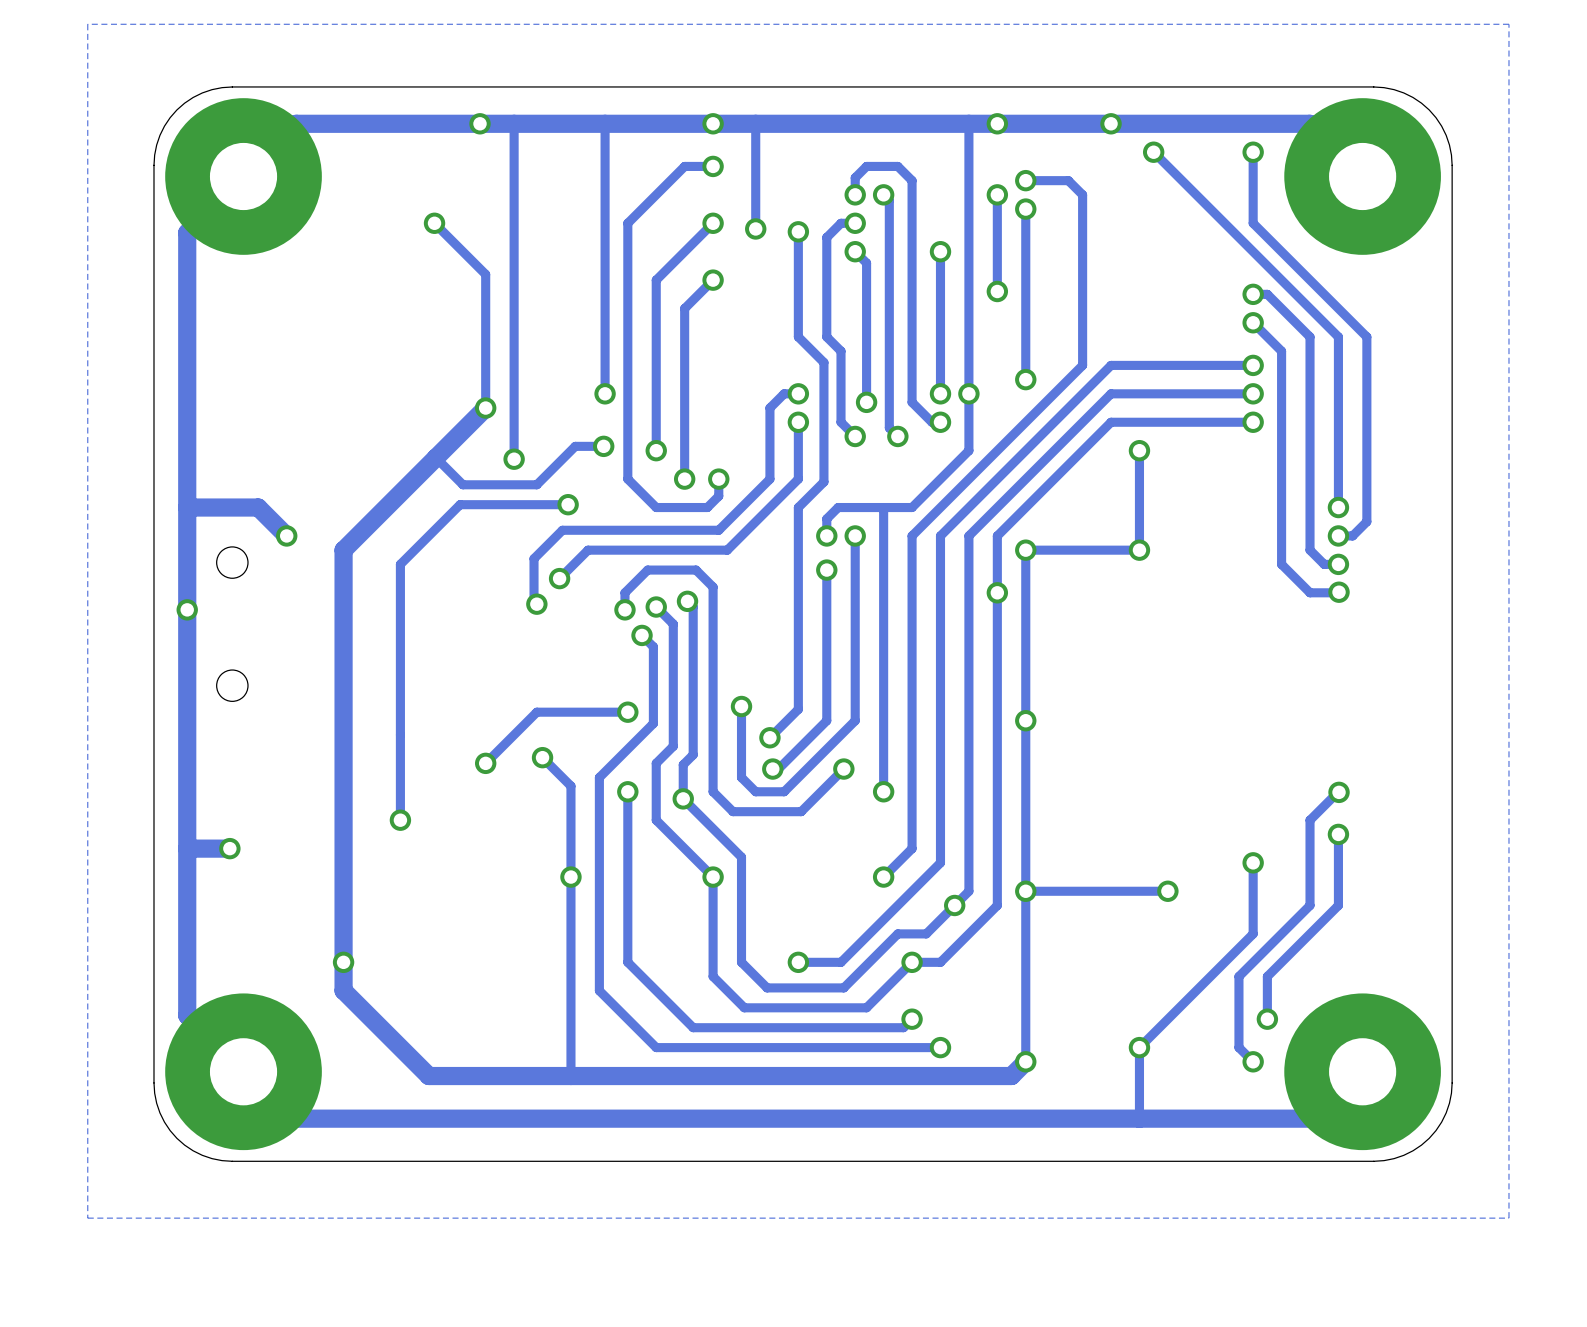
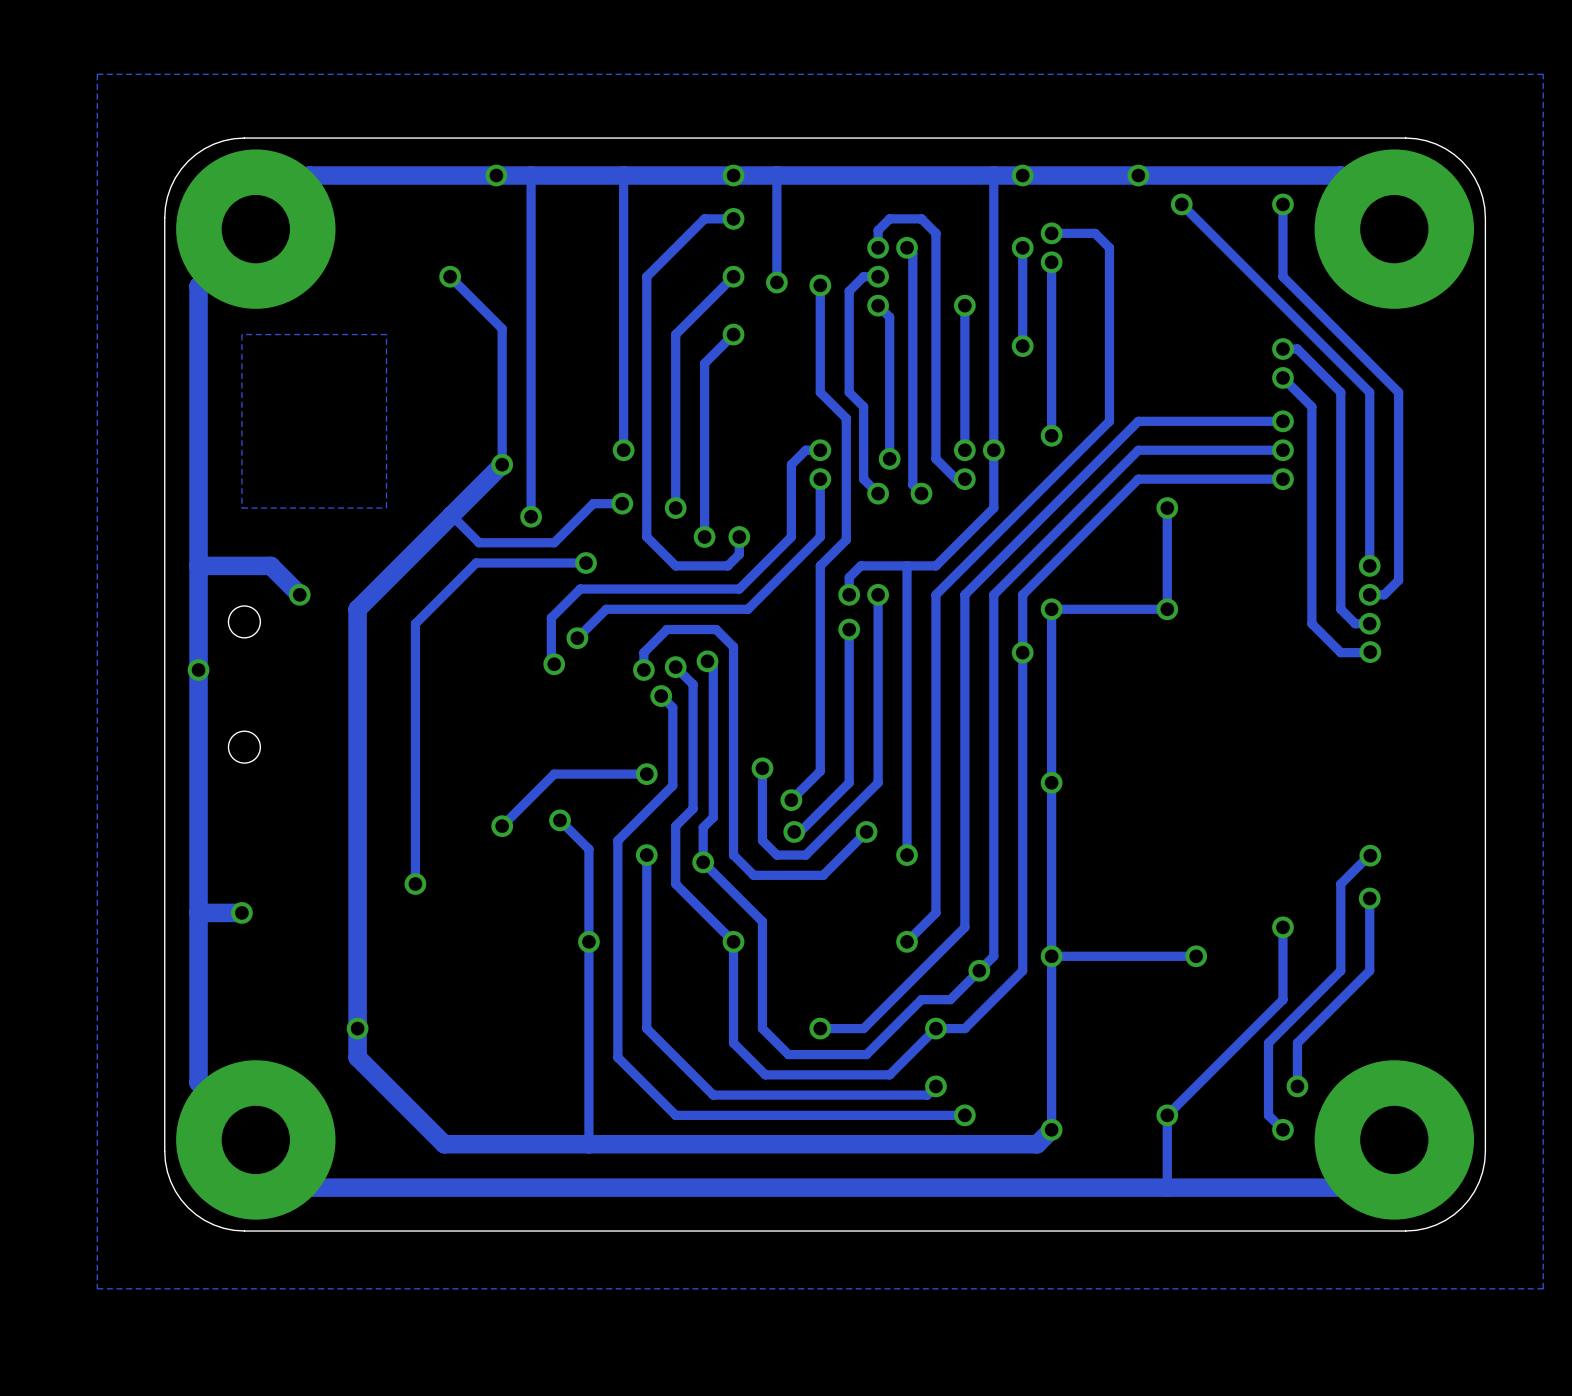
zone outline: none -> (386, 334) (241, 334) (241, 508) (386, 508) (386, 334)

